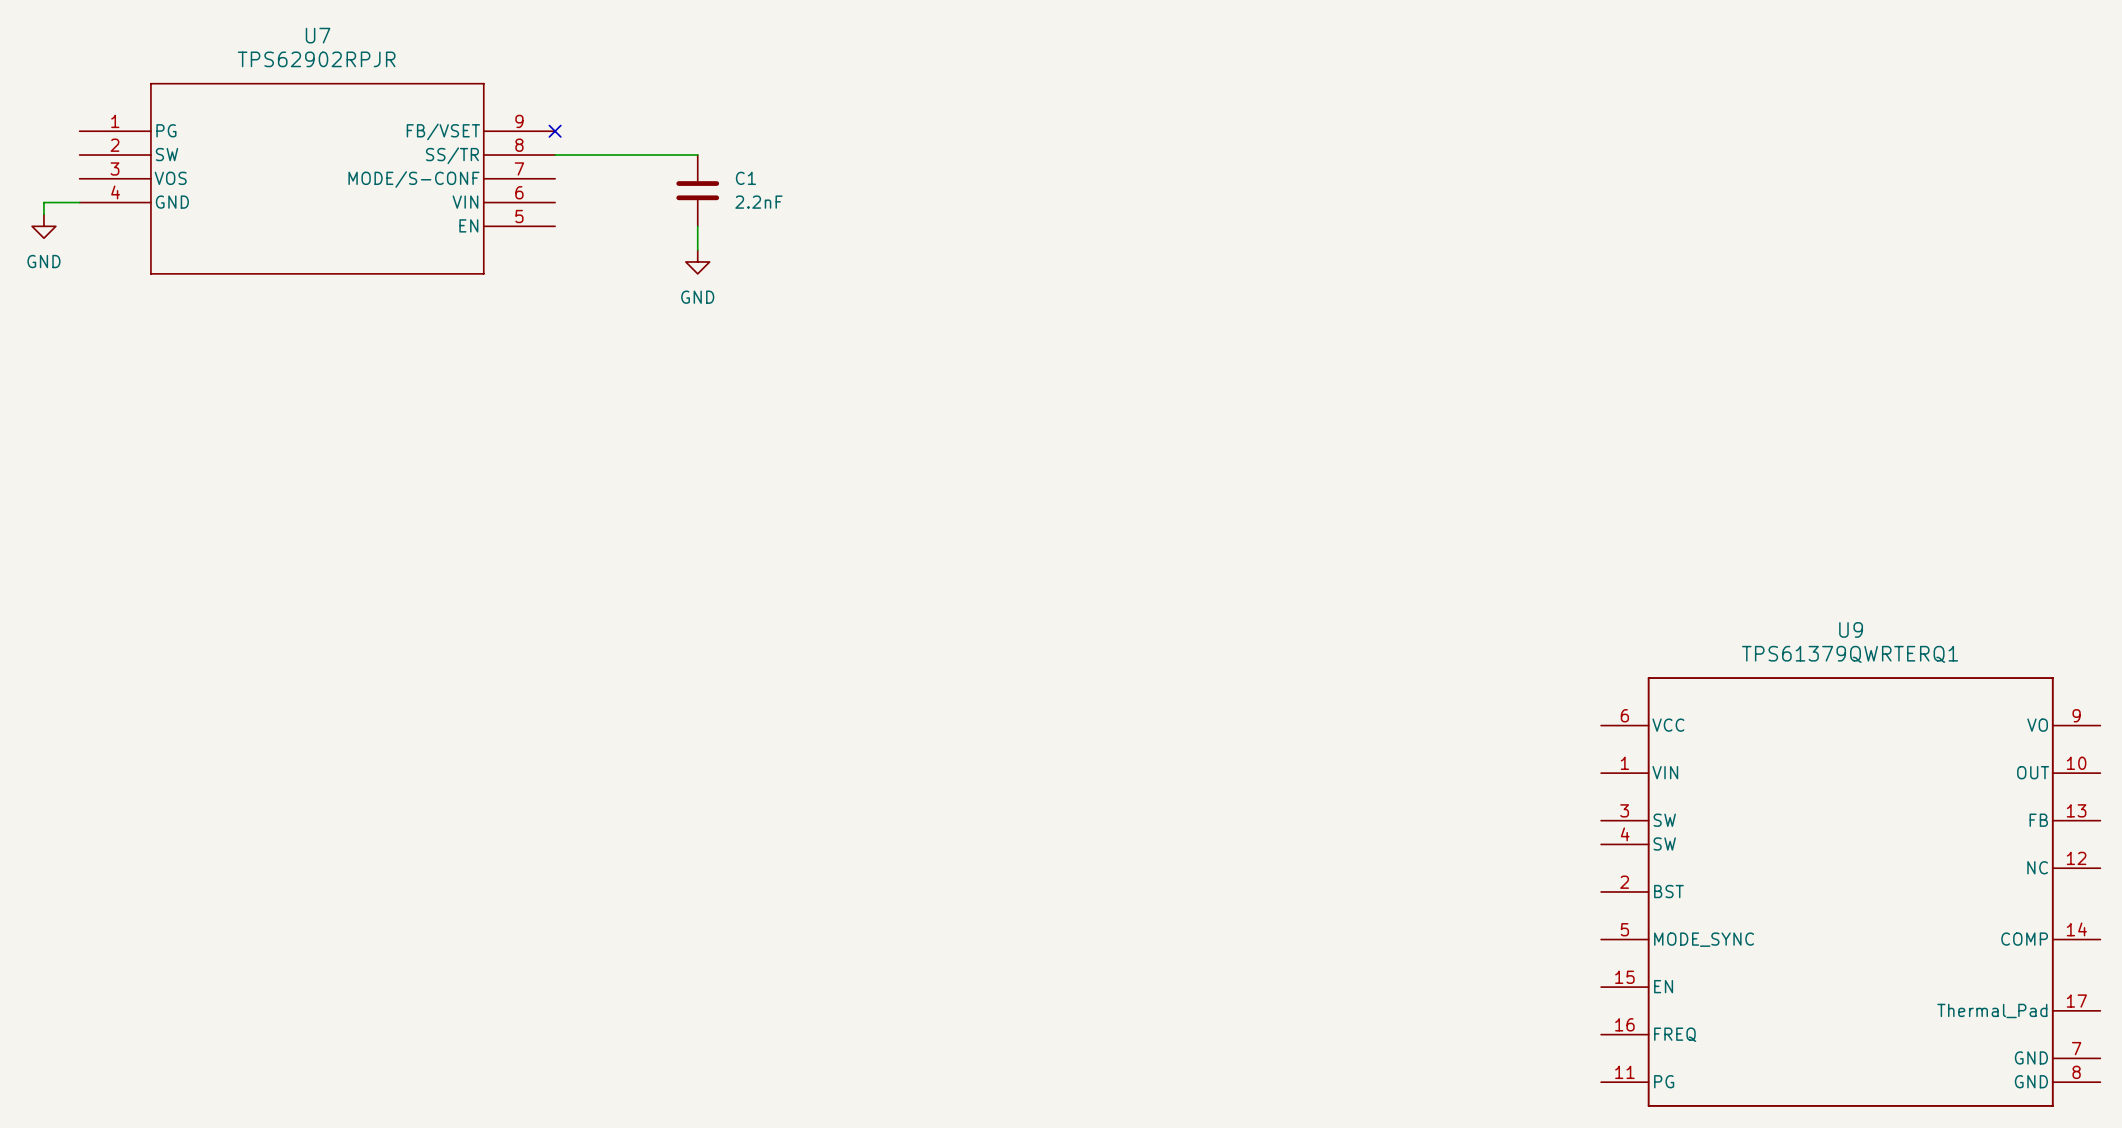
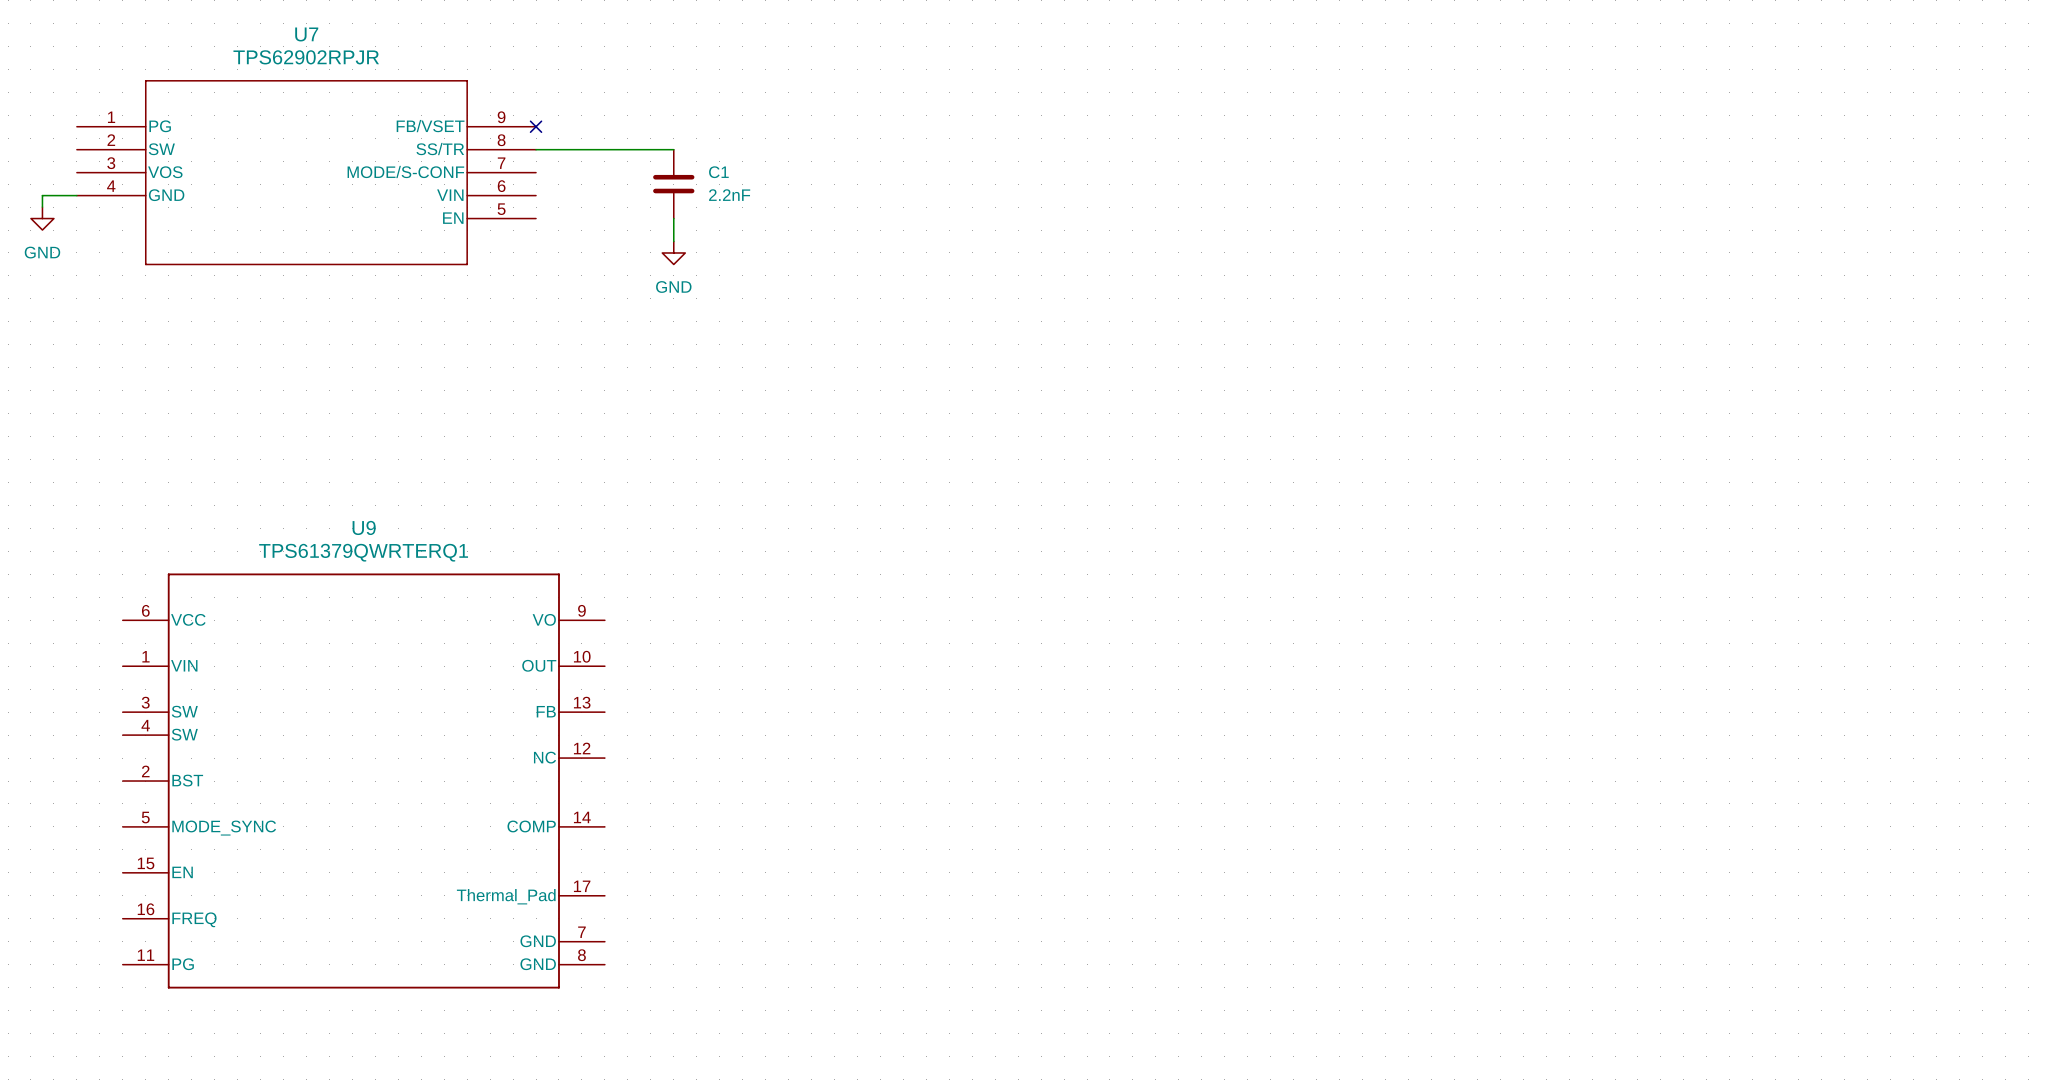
U9 position: (1850, 891) -> (363, 781)

